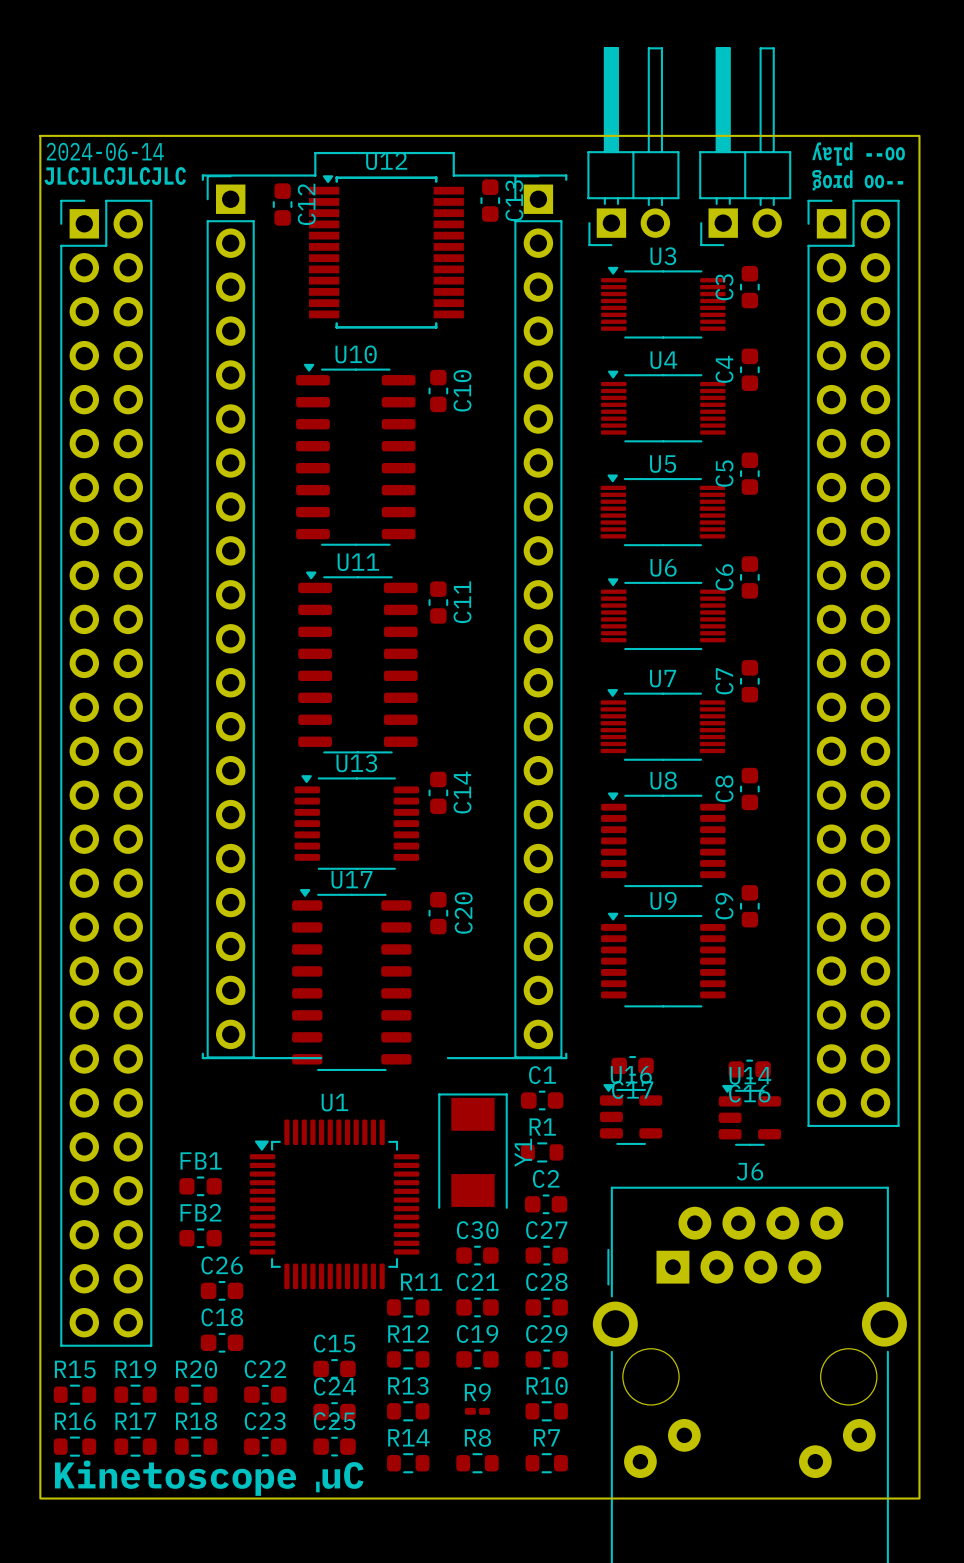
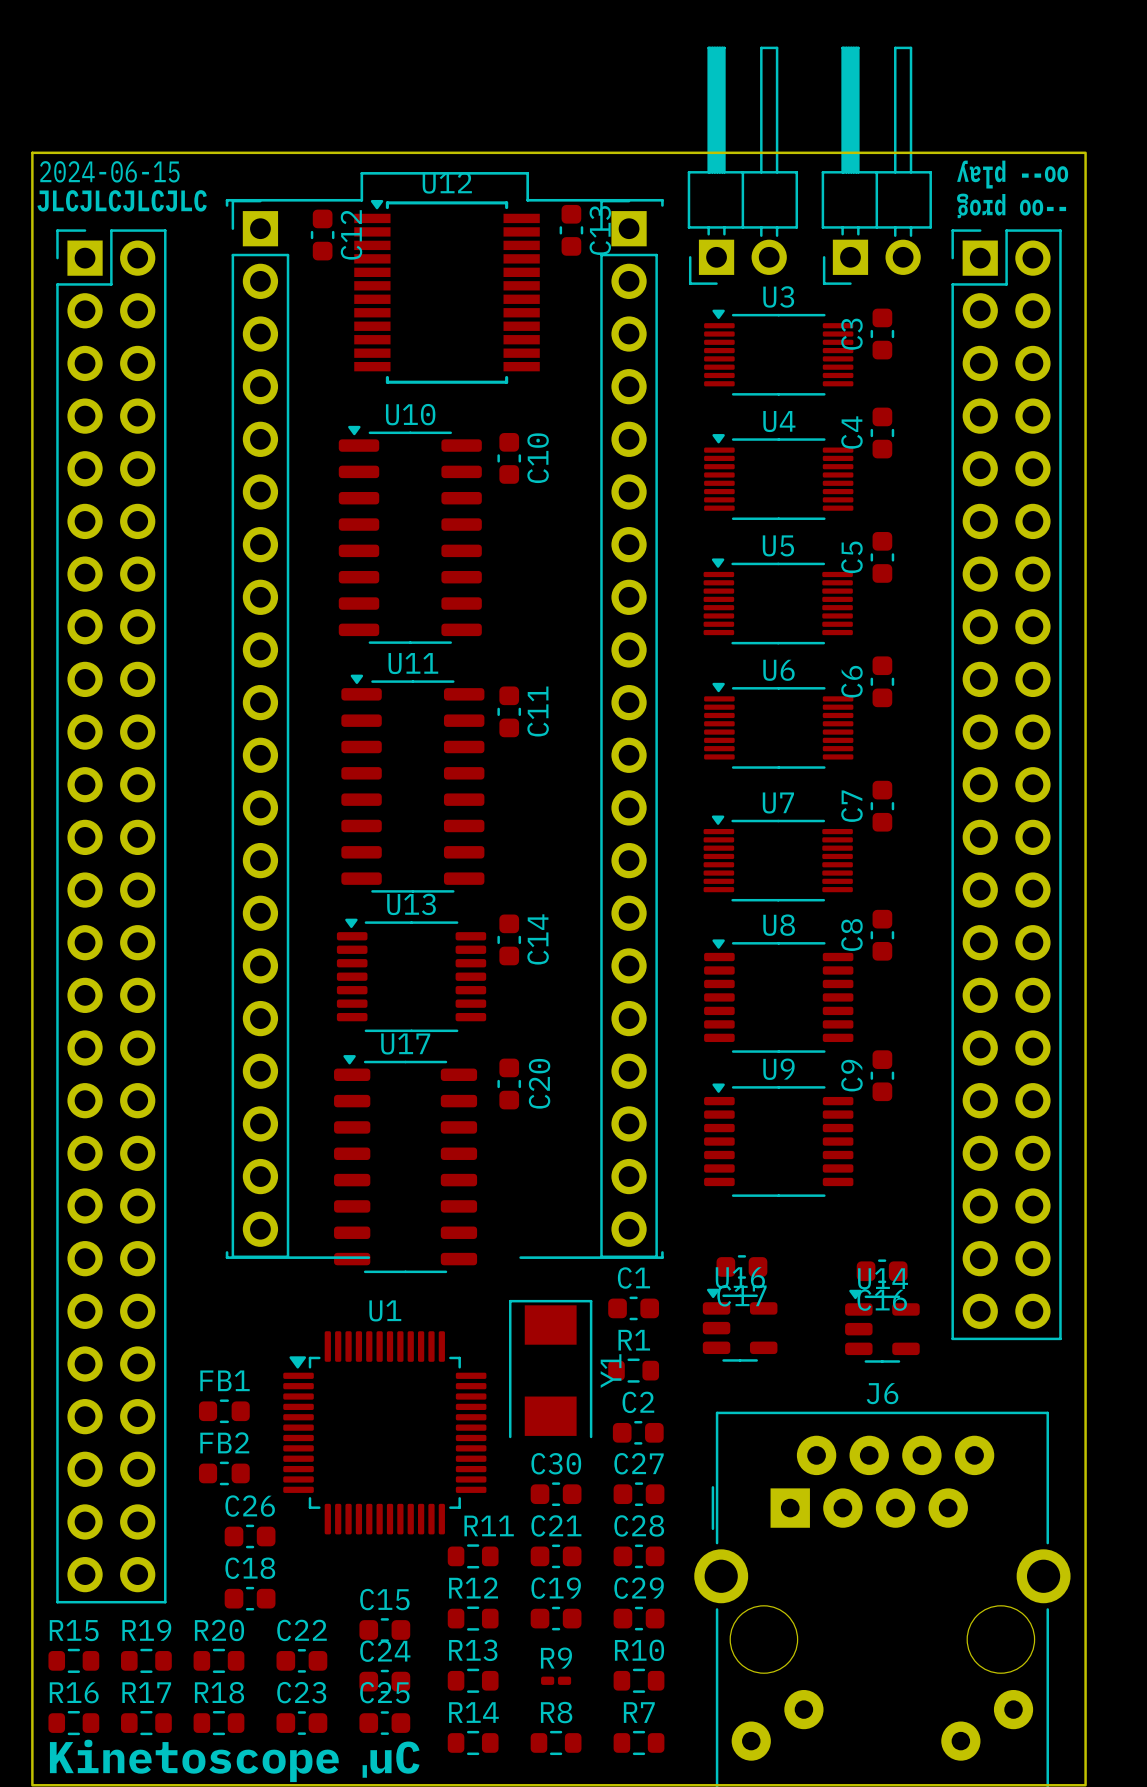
text: 2024-06-14 (105, 151) -> 2024-06-15 (109, 171)

